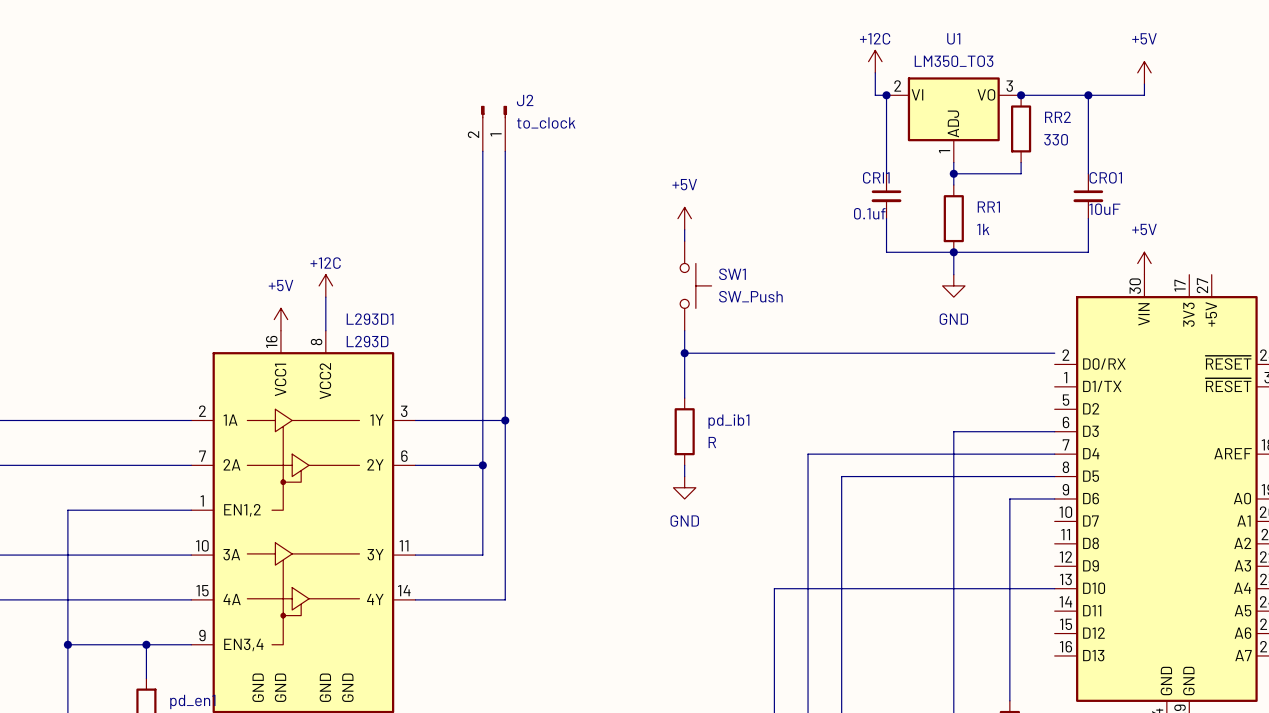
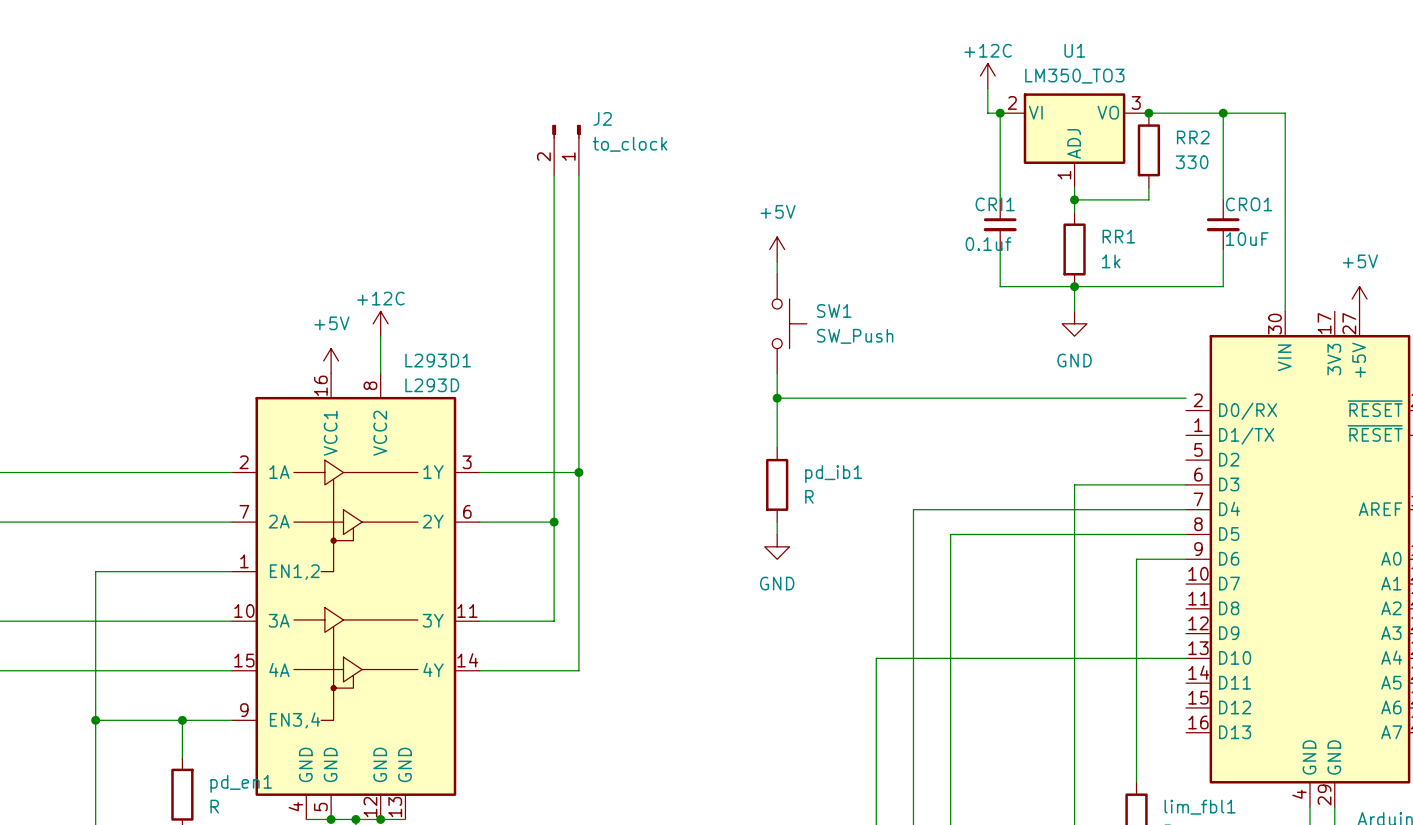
power symbol: +5V (1144, 72) -> none
wire: (1144, 84) (1144, 95) -> (1285, 311) (1285, 113)
power symbol position: +5V (1144, 263) -> +5V (1359, 299)

